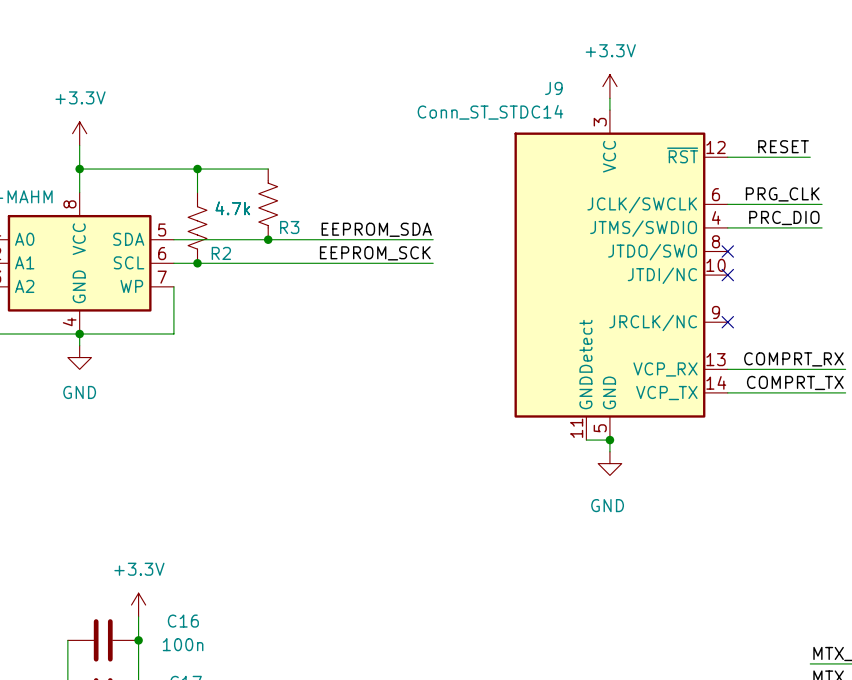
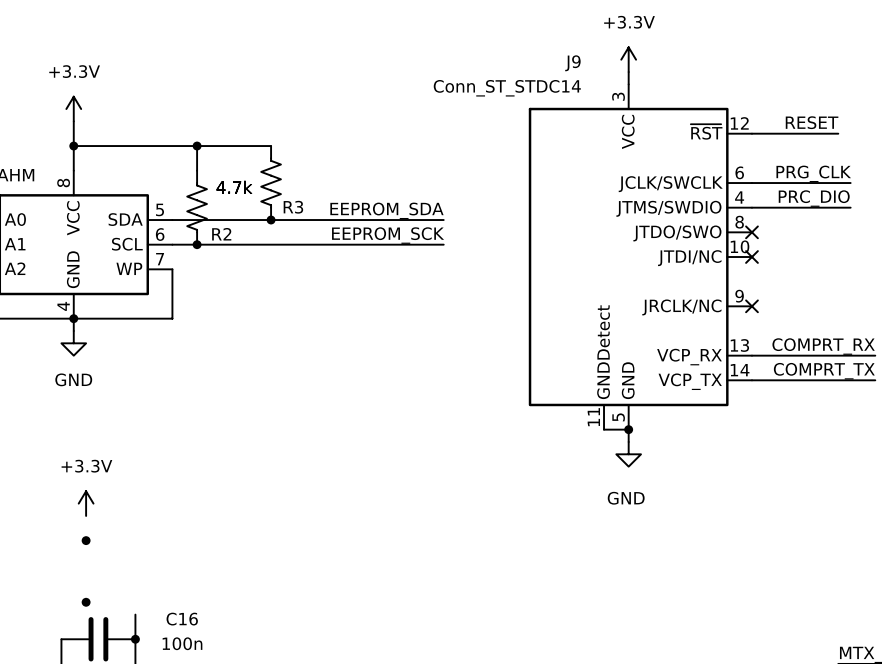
junction: none -> (86, 540)
junction: none -> (86, 602)
power symbol position: +3.3V (138, 605) -> +3.3V (86, 503)

